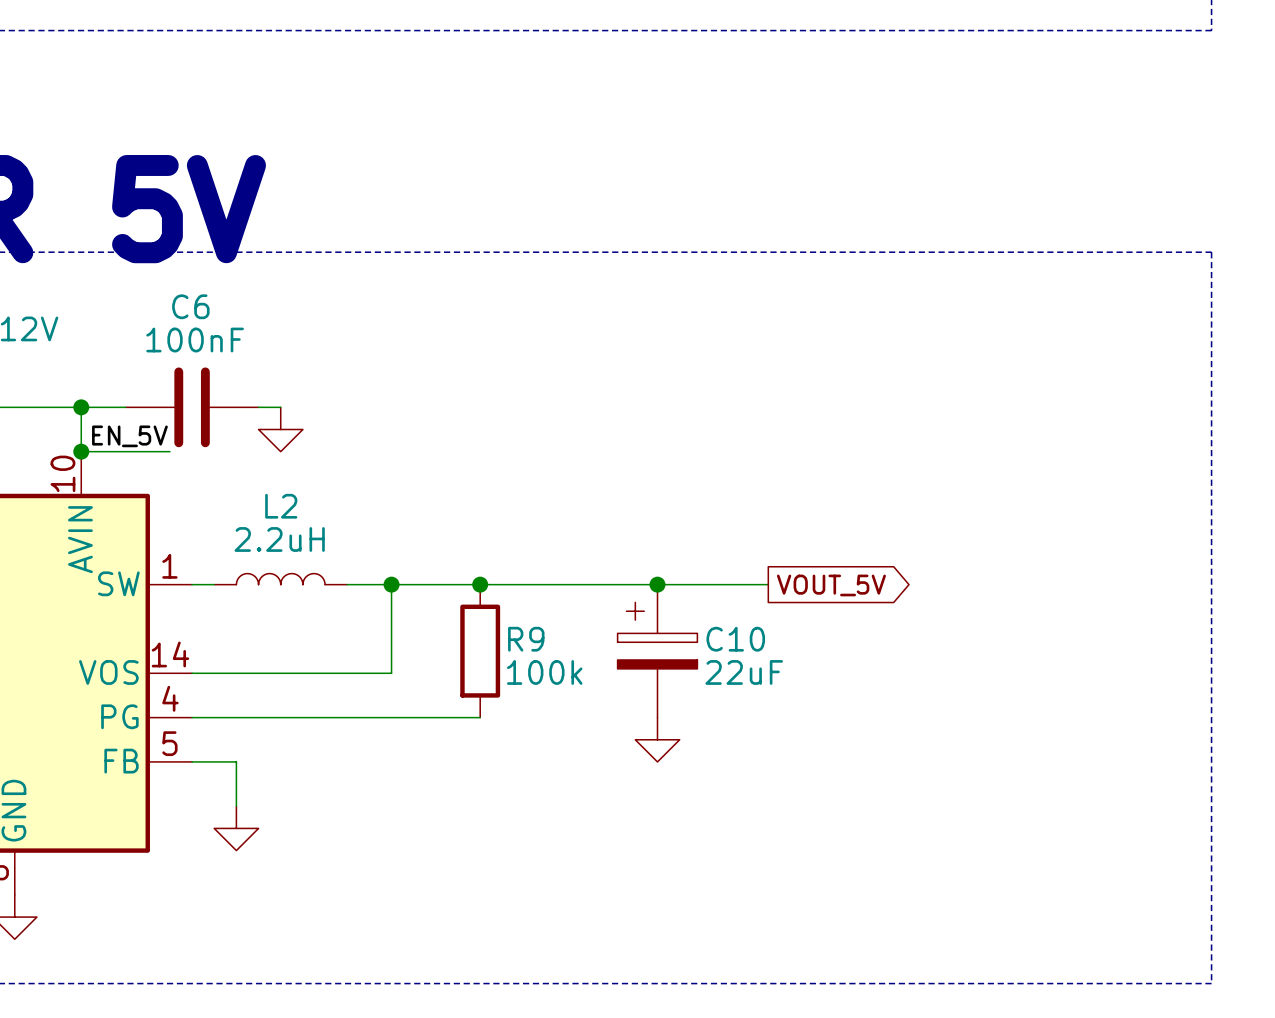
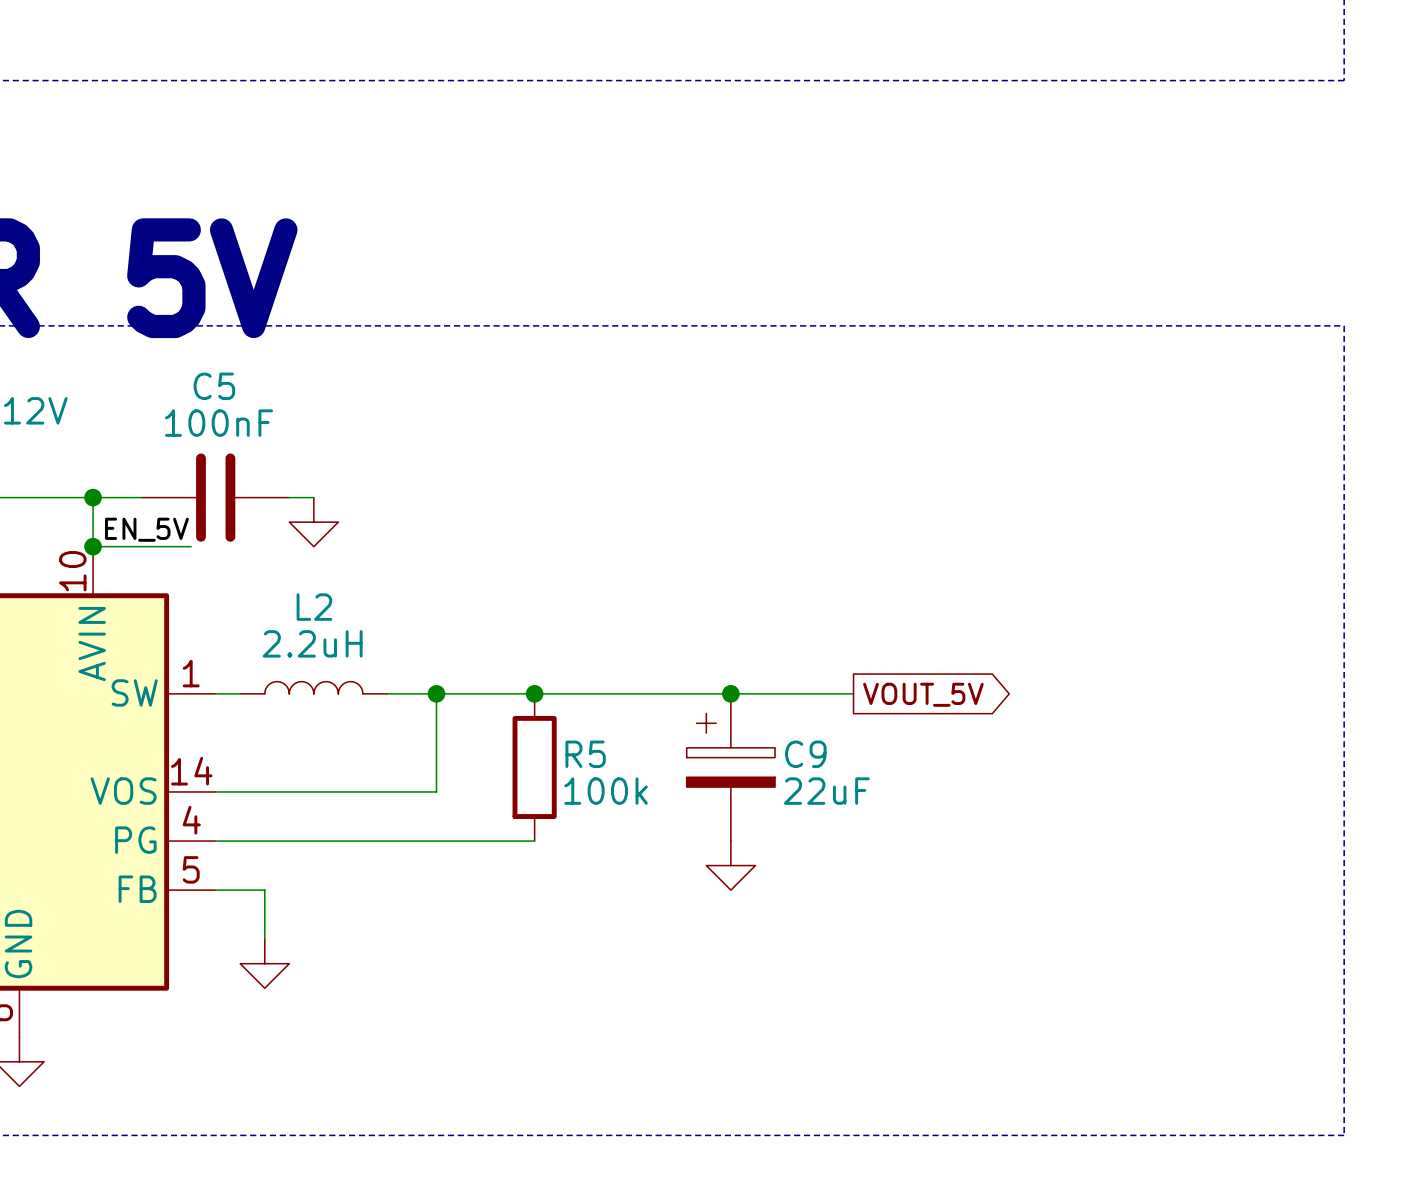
C6 name: C6 (190, 306) -> C5 (214, 386)
R9 name: R9 (526, 639) -> R5 (585, 754)
C10 name: C10 (735, 639) -> C9 (805, 754)

